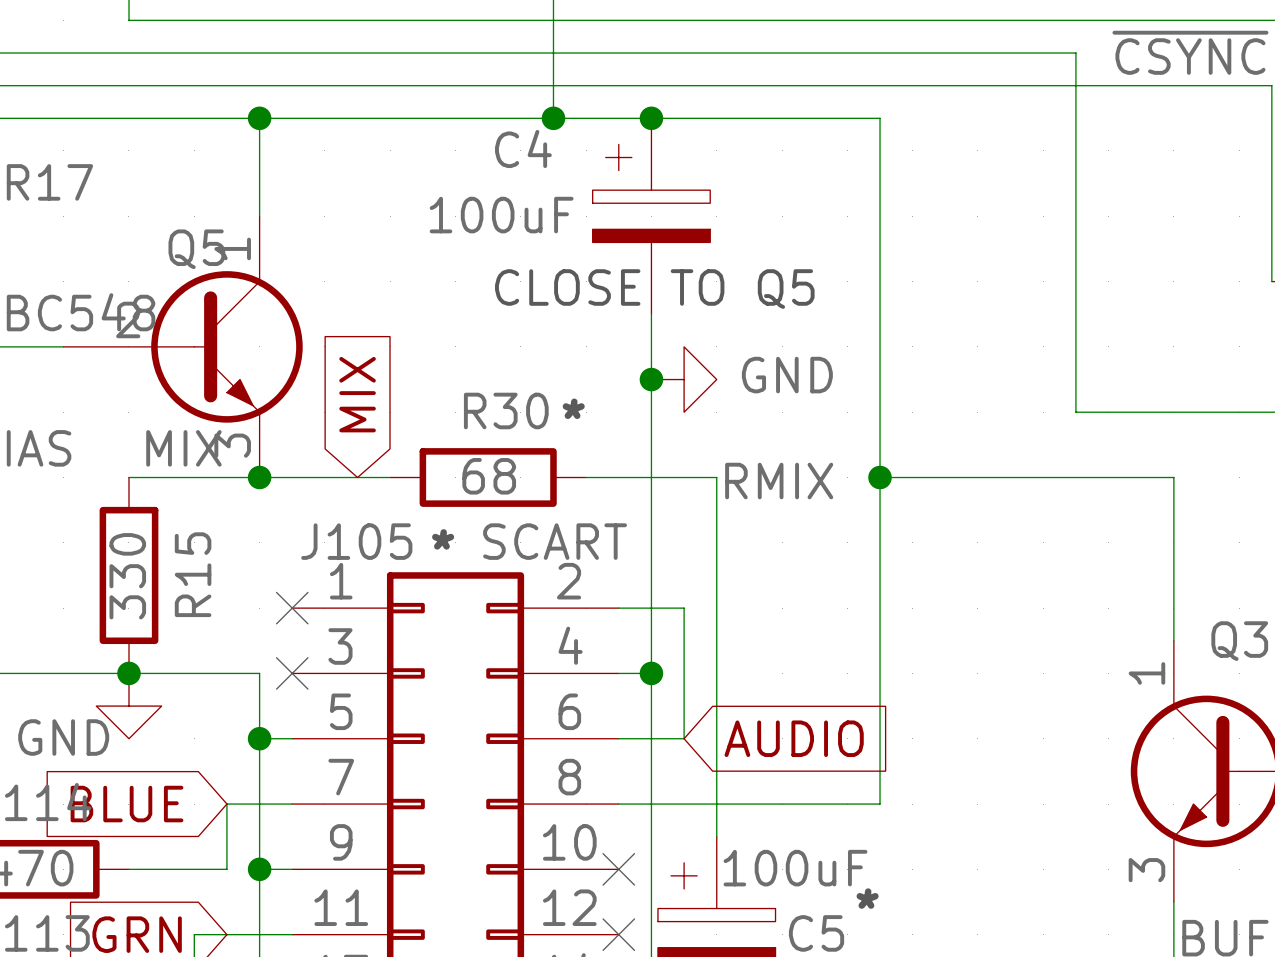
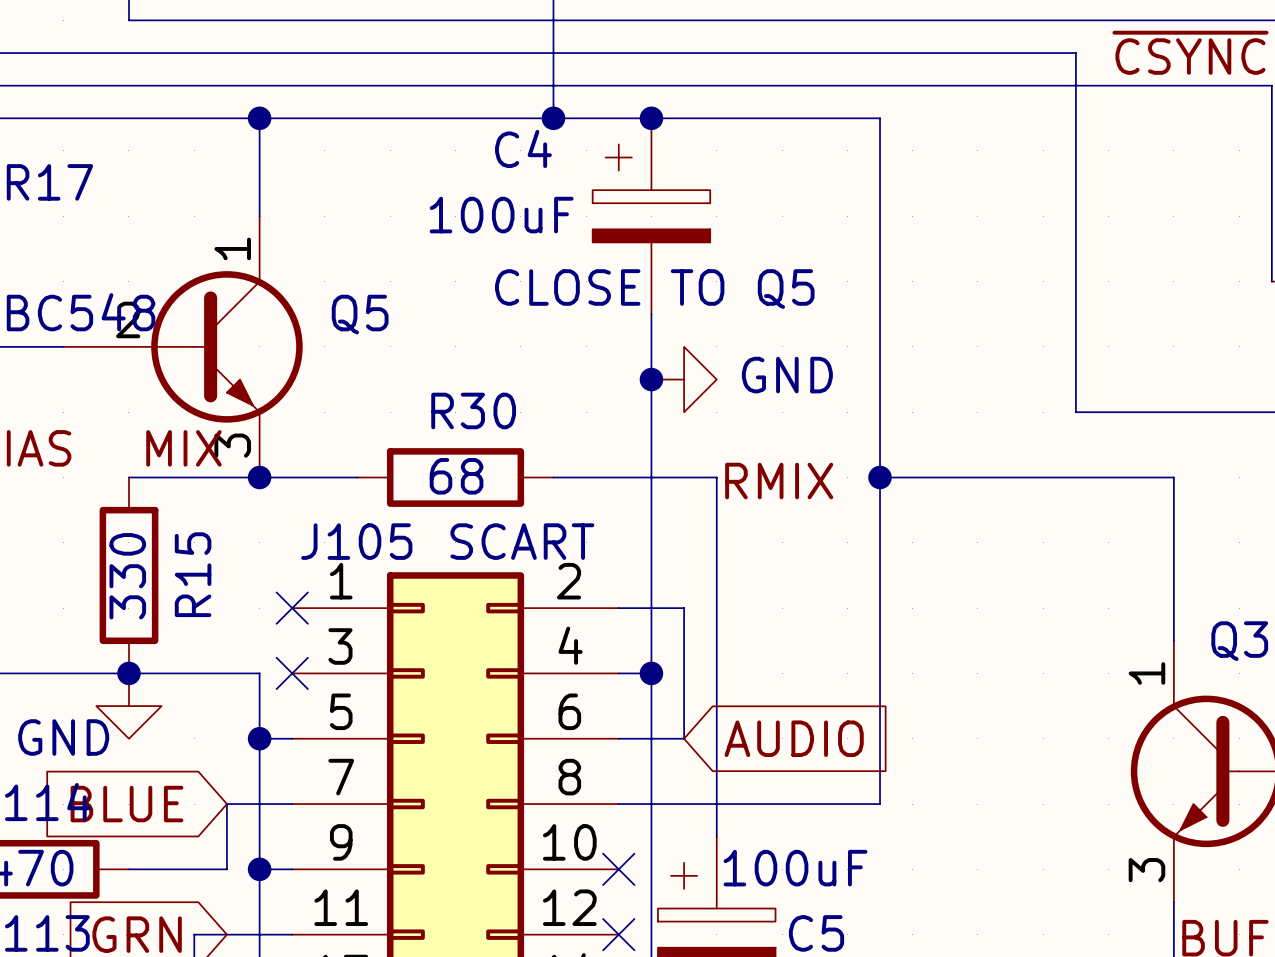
Q5 name position: Q5 (196, 249) -> Q5 (360, 314)
global label: MIX (357, 394) -> none
text: * (573, 408) -> none
R30 position: (488, 477) -> (455, 477)
text: * (443, 539) -> none
J105 value position: SCART (555, 541) -> SCART (522, 541)
text: * (867, 898) -> none

